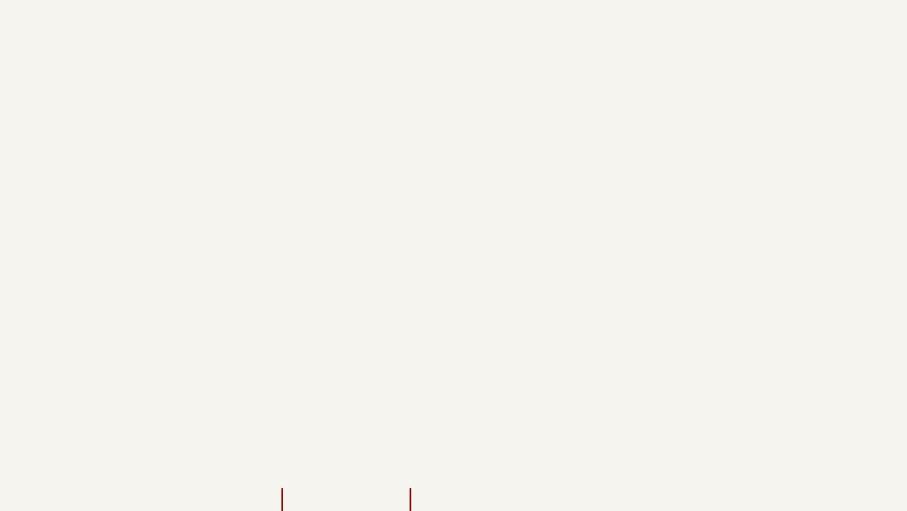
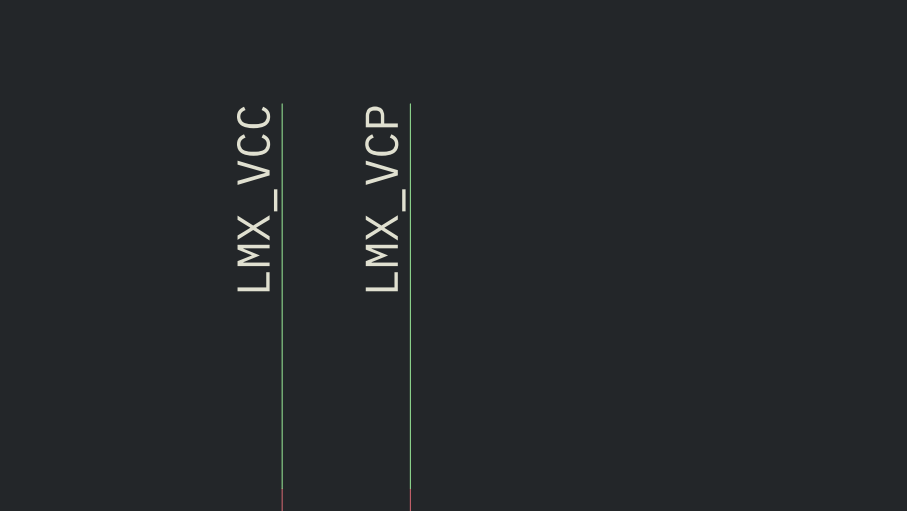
wire: none -> (282, 103) (282, 488)
wire: none -> (410, 103) (410, 488)
label: none -> LMX_VCP (385, 198)
label: none -> LMX_VCC (257, 199)

